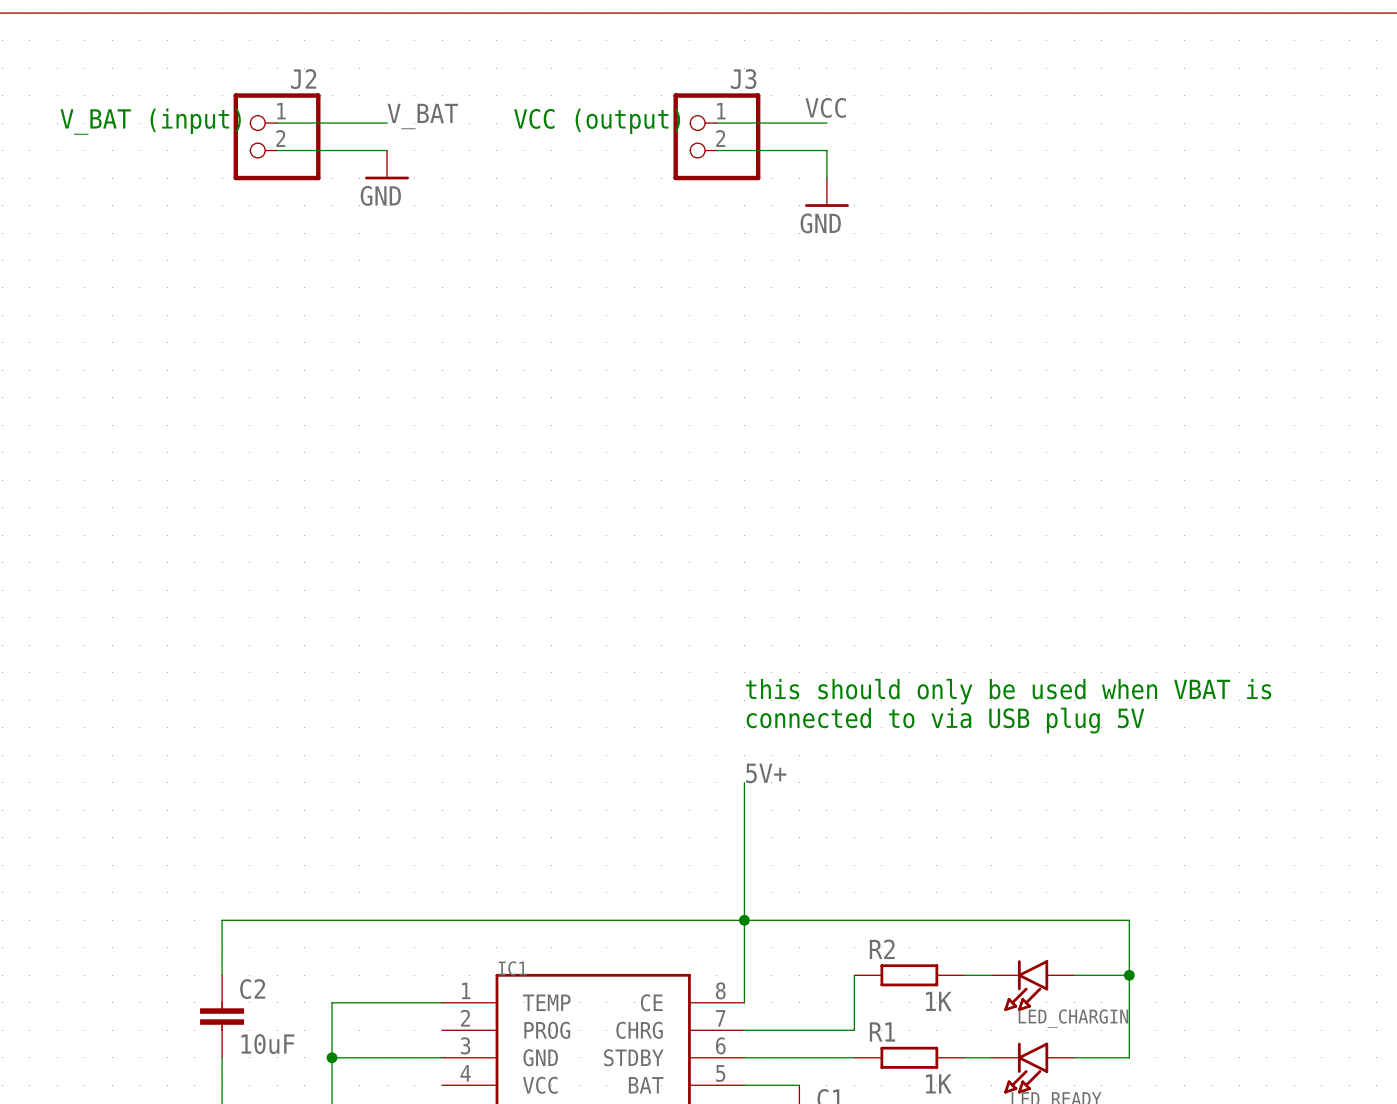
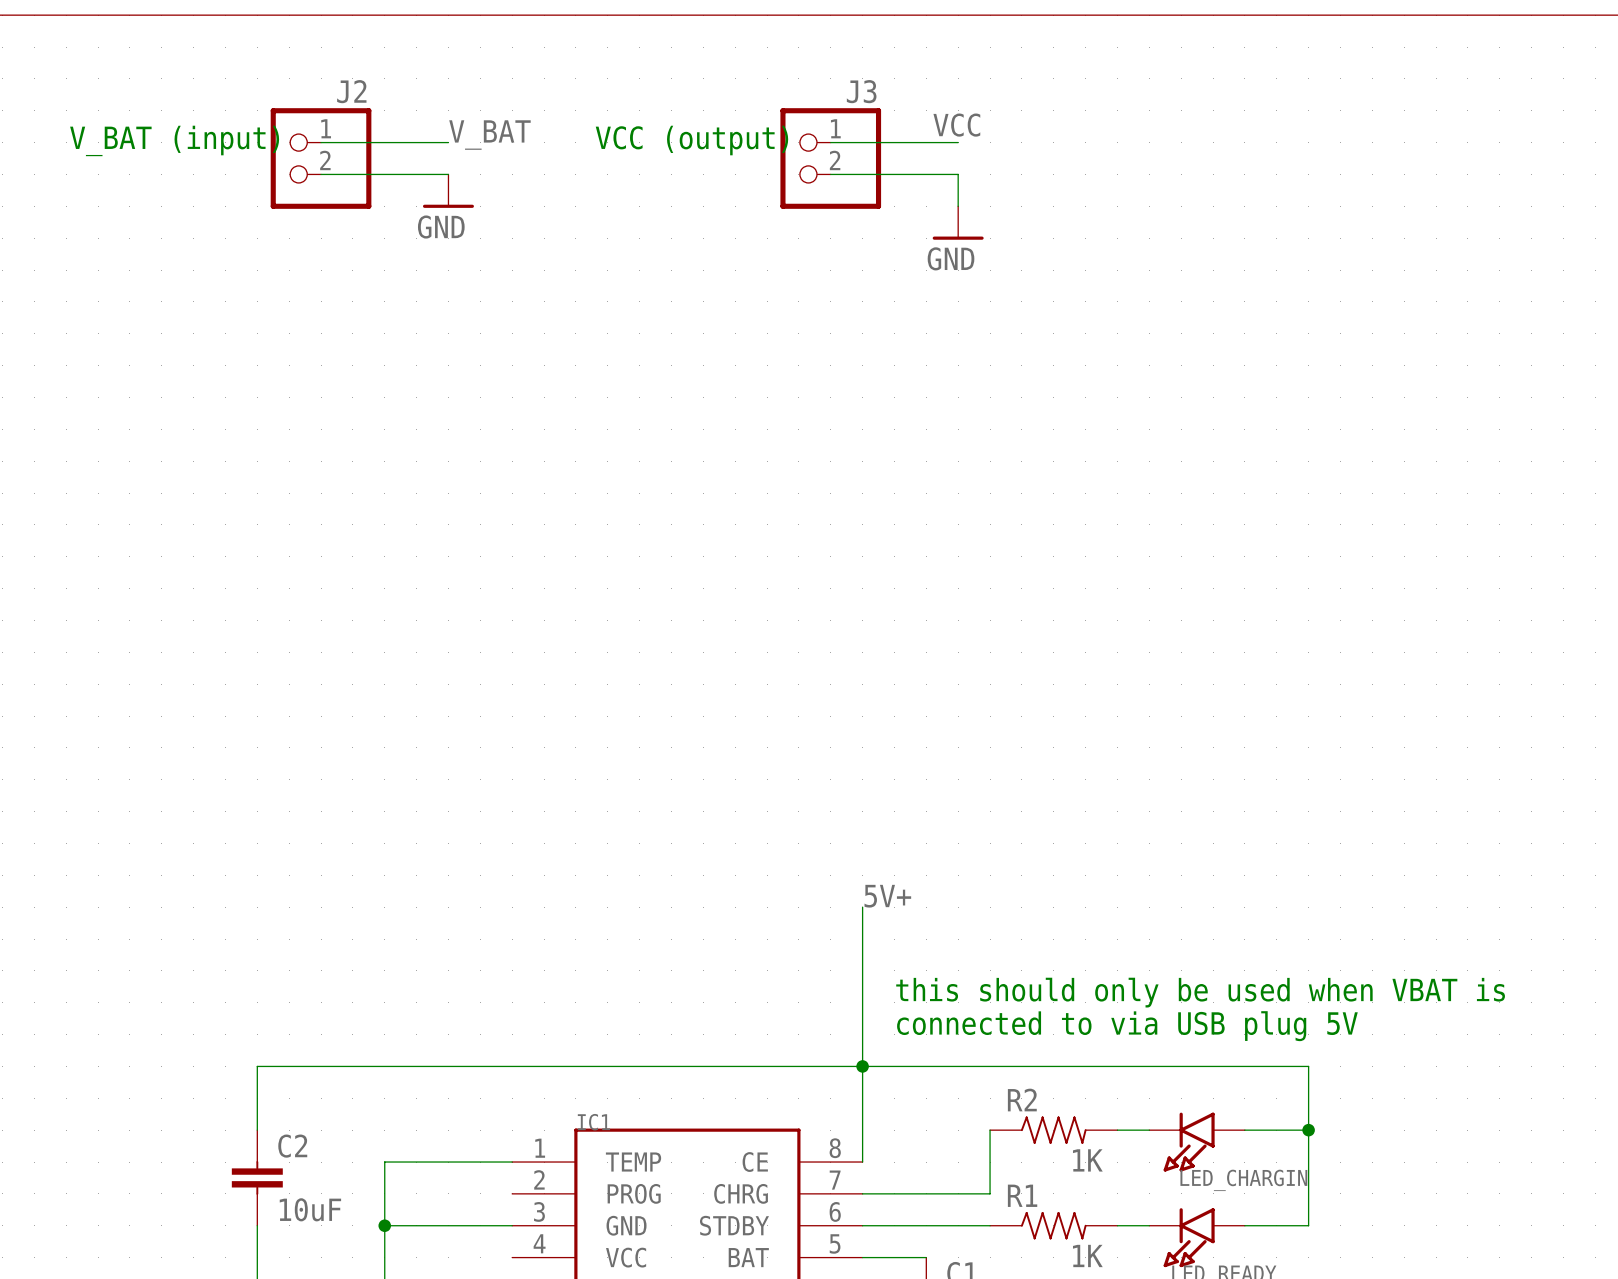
text position: this should only be used when VBAT is (1008, 691) -> this should only be used when VBAT is (1200, 992)
text position: connected to via USB plug 5V (945, 720) -> connected to via USB plug 5V (1127, 1026)
R2 symbol: [854, 964, 965, 987] -> [990, 1116, 1118, 1144]
R1 symbol: [854, 1046, 965, 1069] -> [990, 1212, 1118, 1240]

